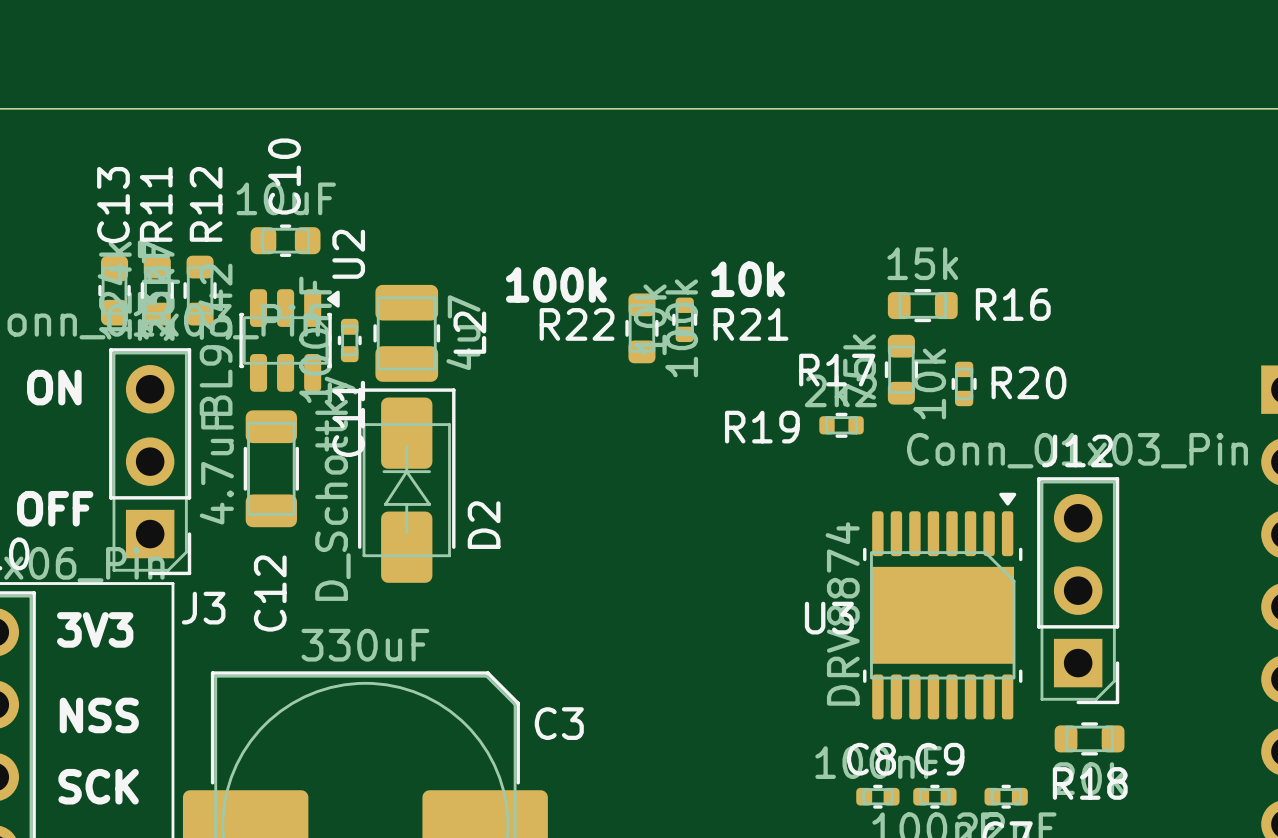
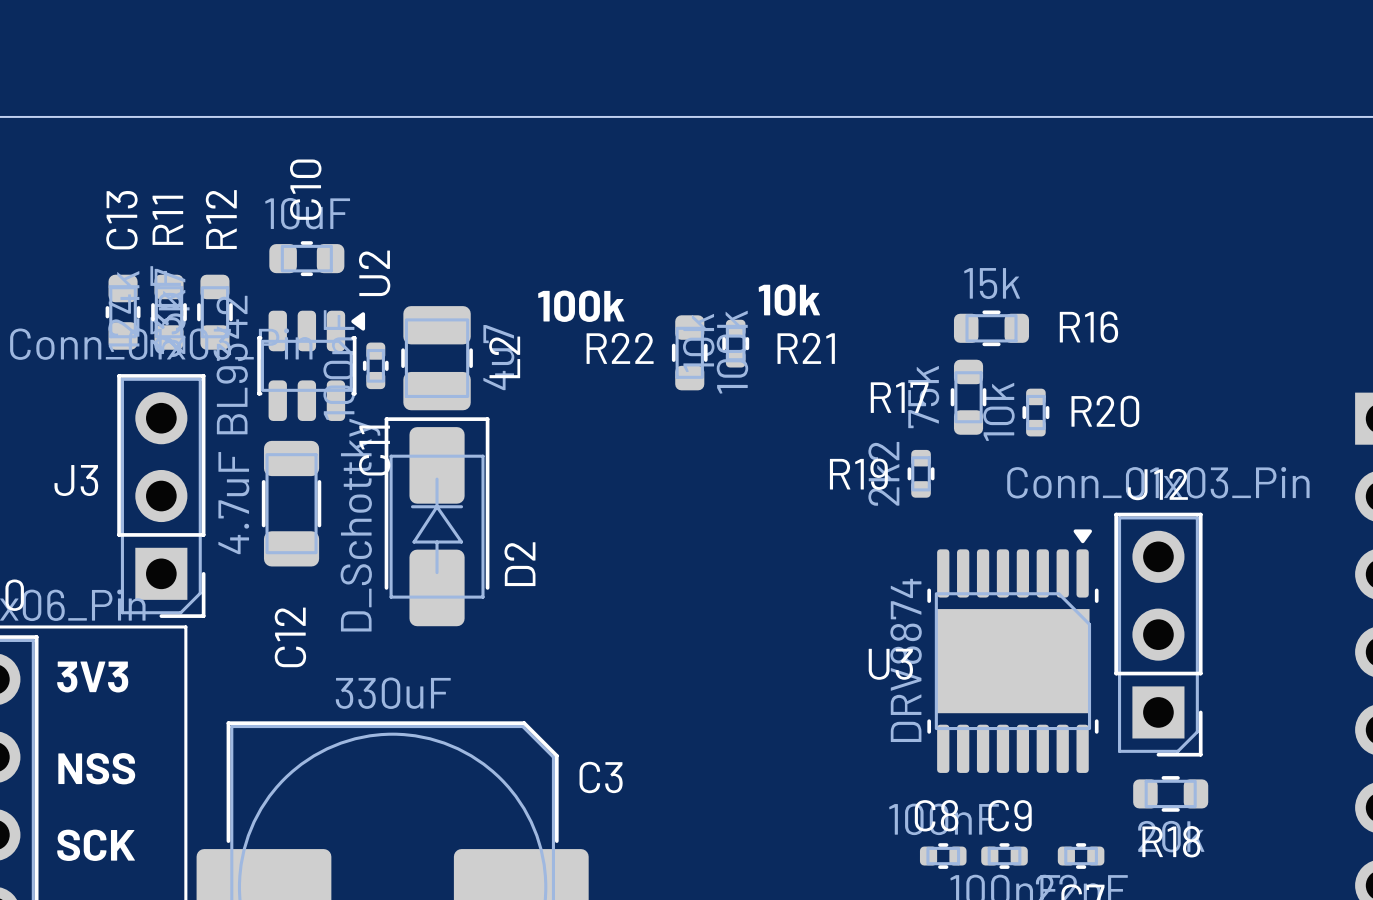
text: ON (54, 387) -> none
R19 rotation: 0° (841, 425) -> 90° clockwise (921, 473)
text: OFF (55, 508) -> none
J3 name position: J3 (203, 608) -> J3 (76, 480)

